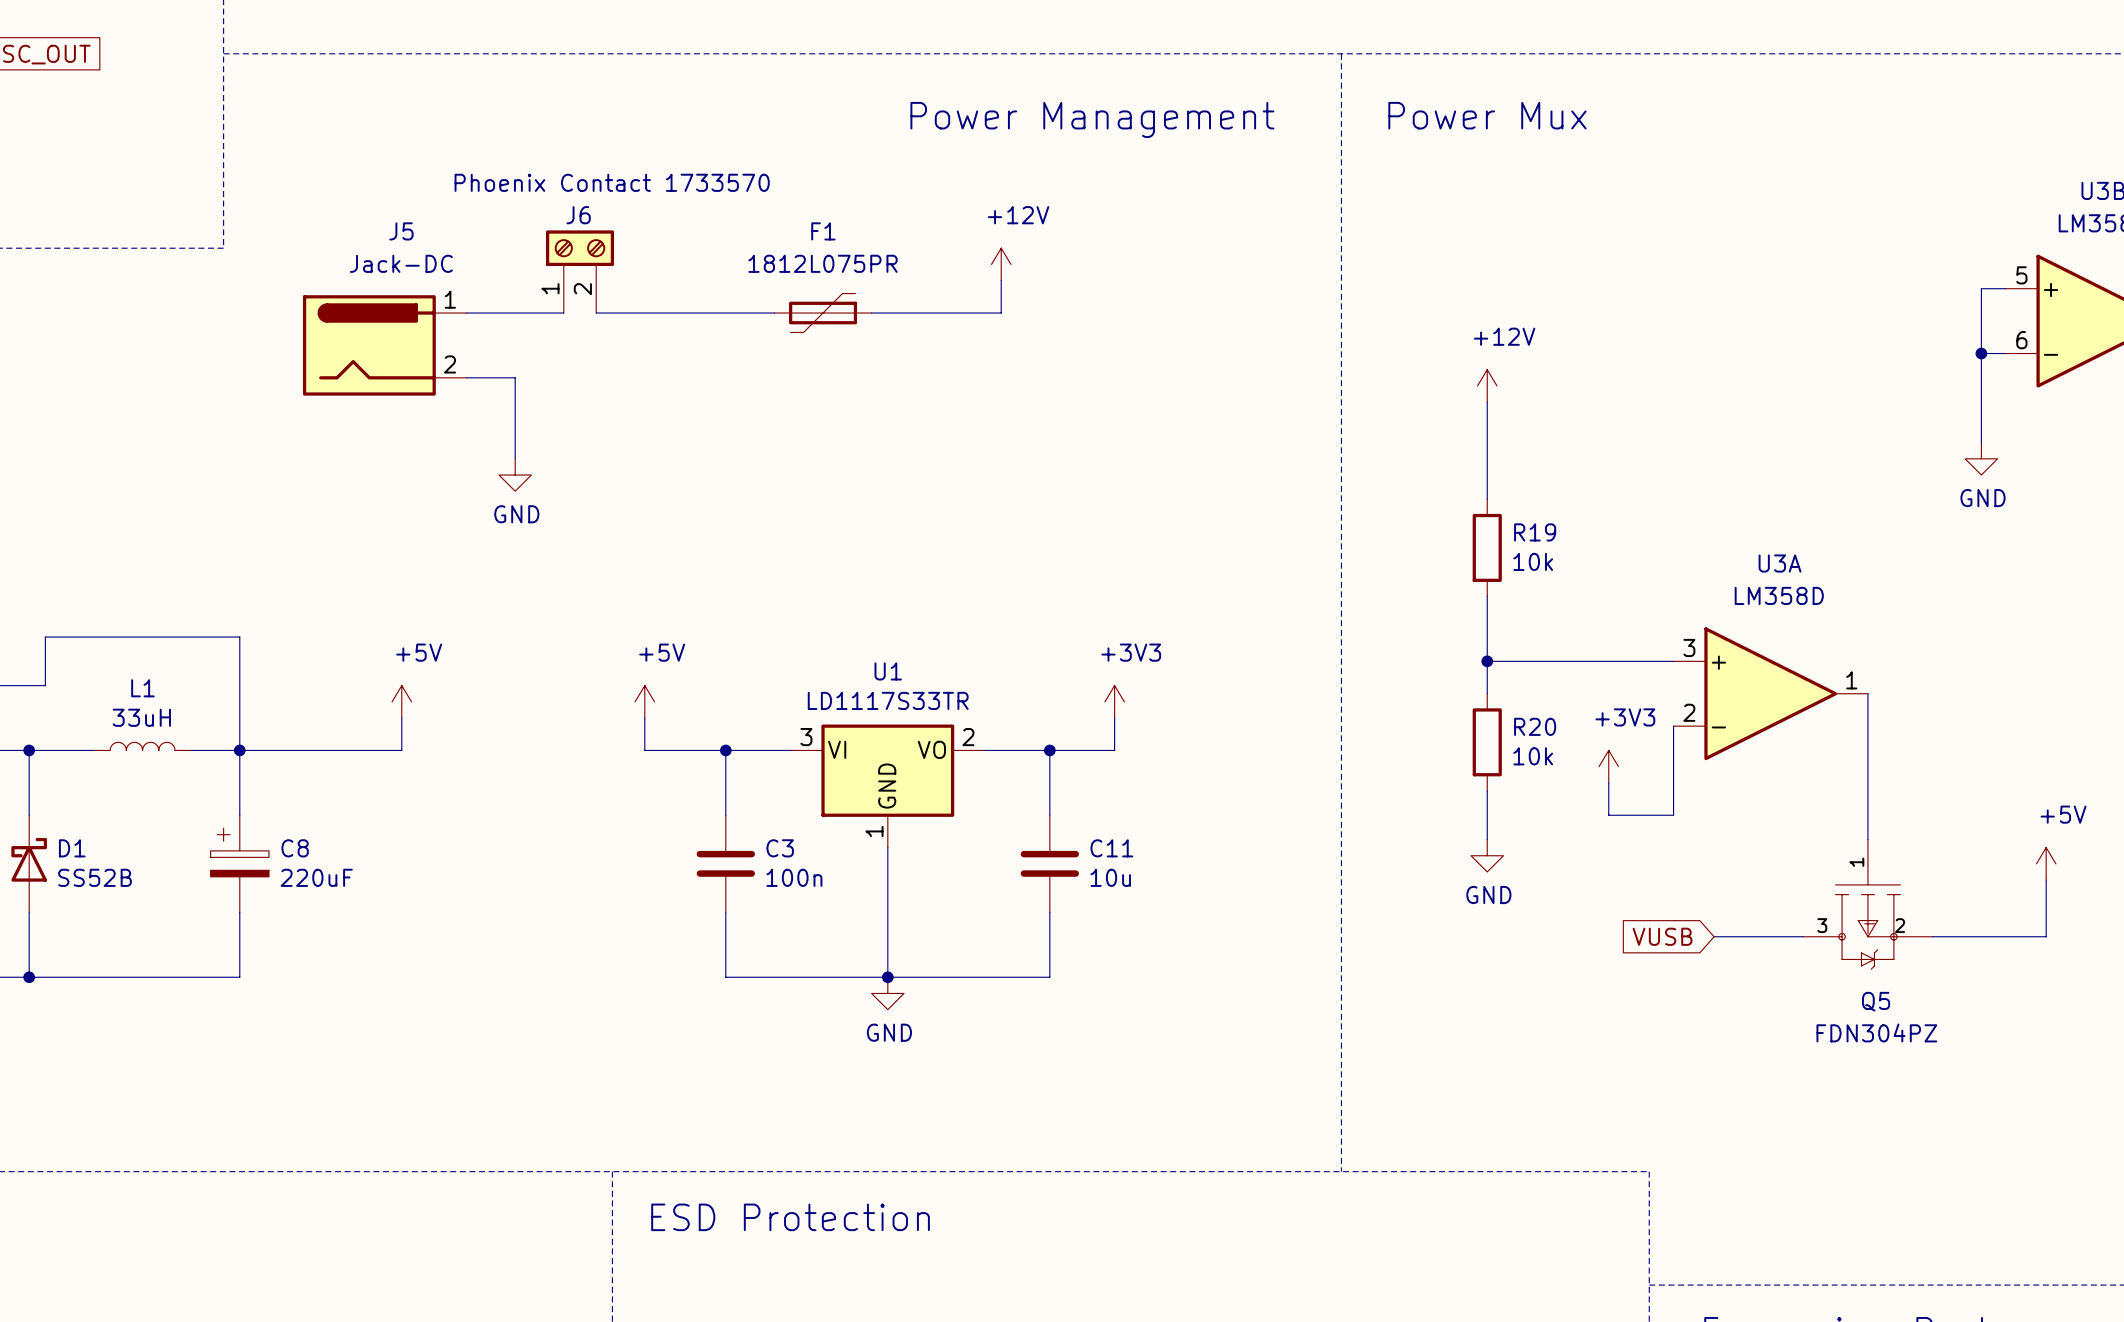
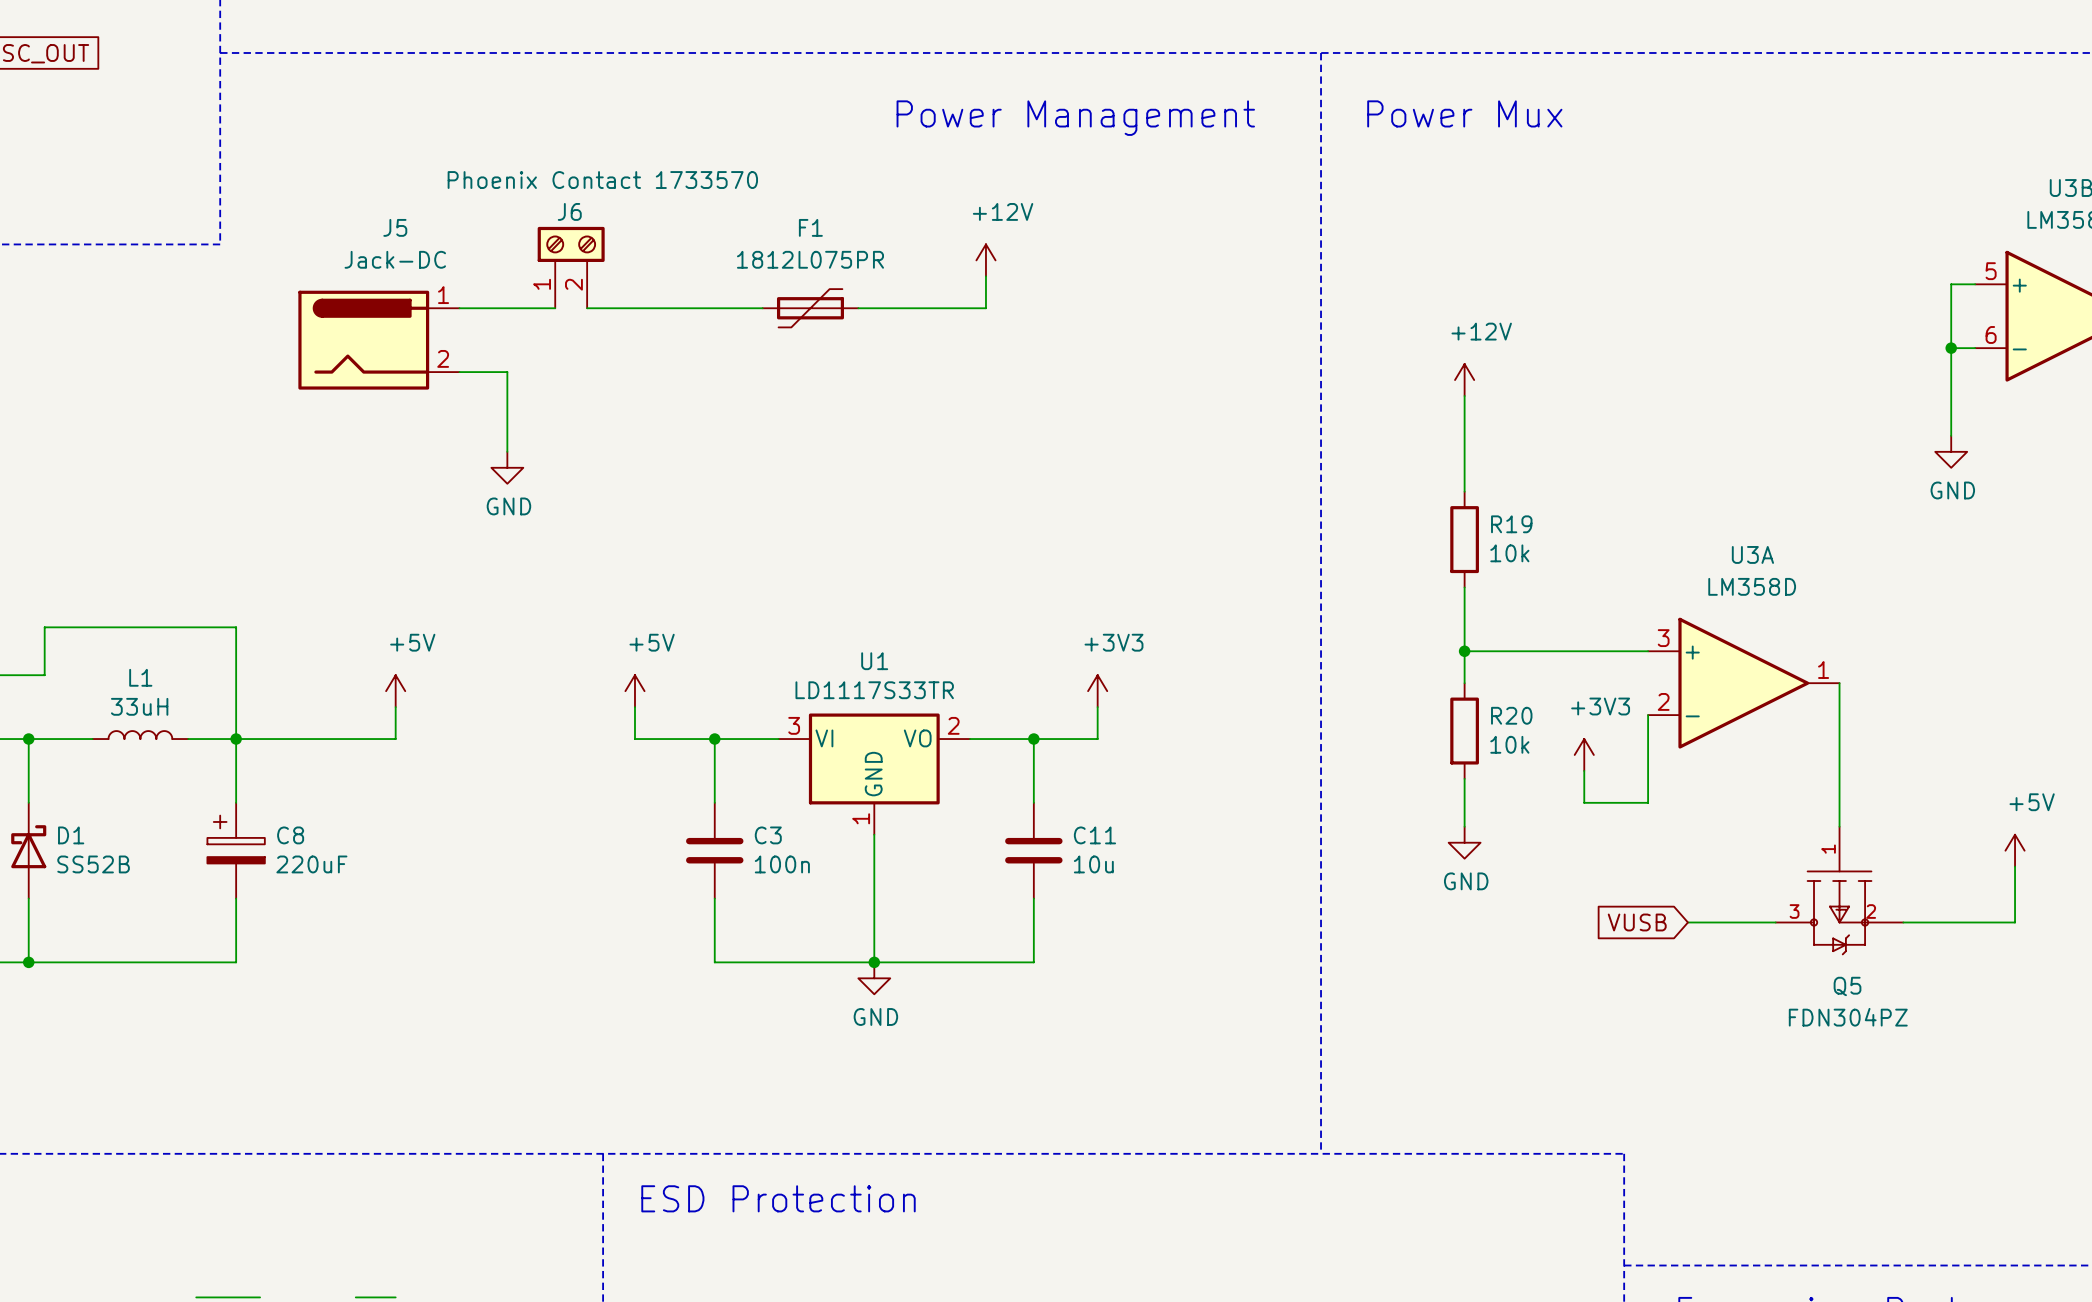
wire: none -> (196, 1297) (260, 1297)
wire: none -> (355, 1297) (395, 1297)

